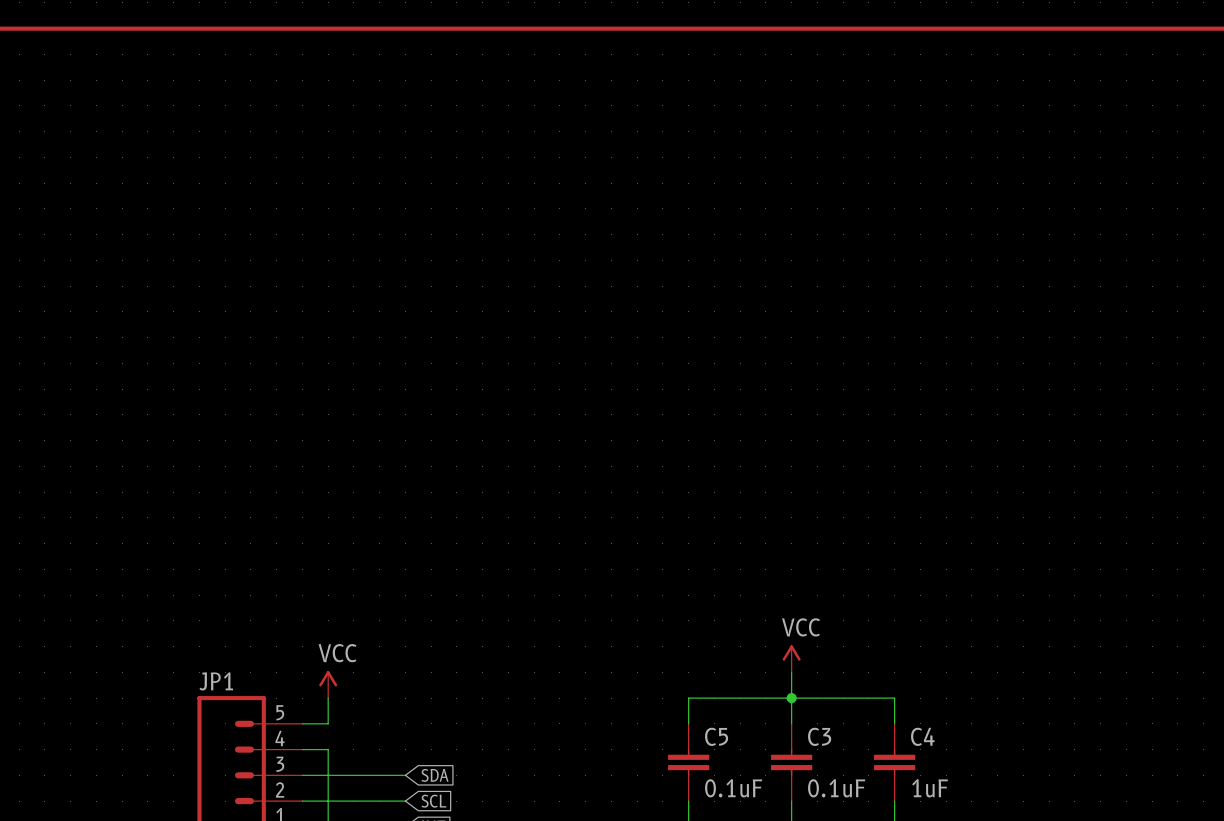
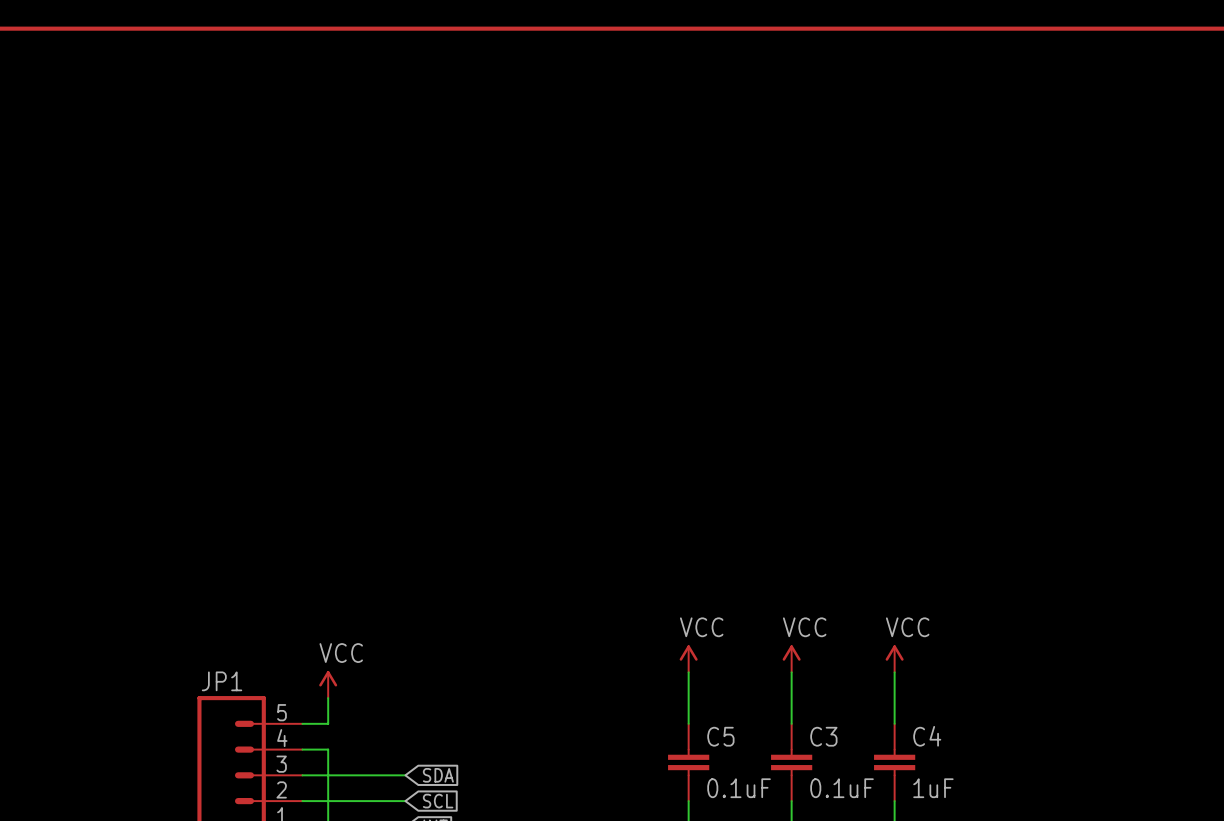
power symbol: none -> VCC (688, 658)
power symbol: none -> VCC (894, 658)
wire: none -> (894, 672) (894, 698)
wire: (688, 698) (894, 698) -> (688, 698) (688, 672)
junction: (791, 698) -> none

